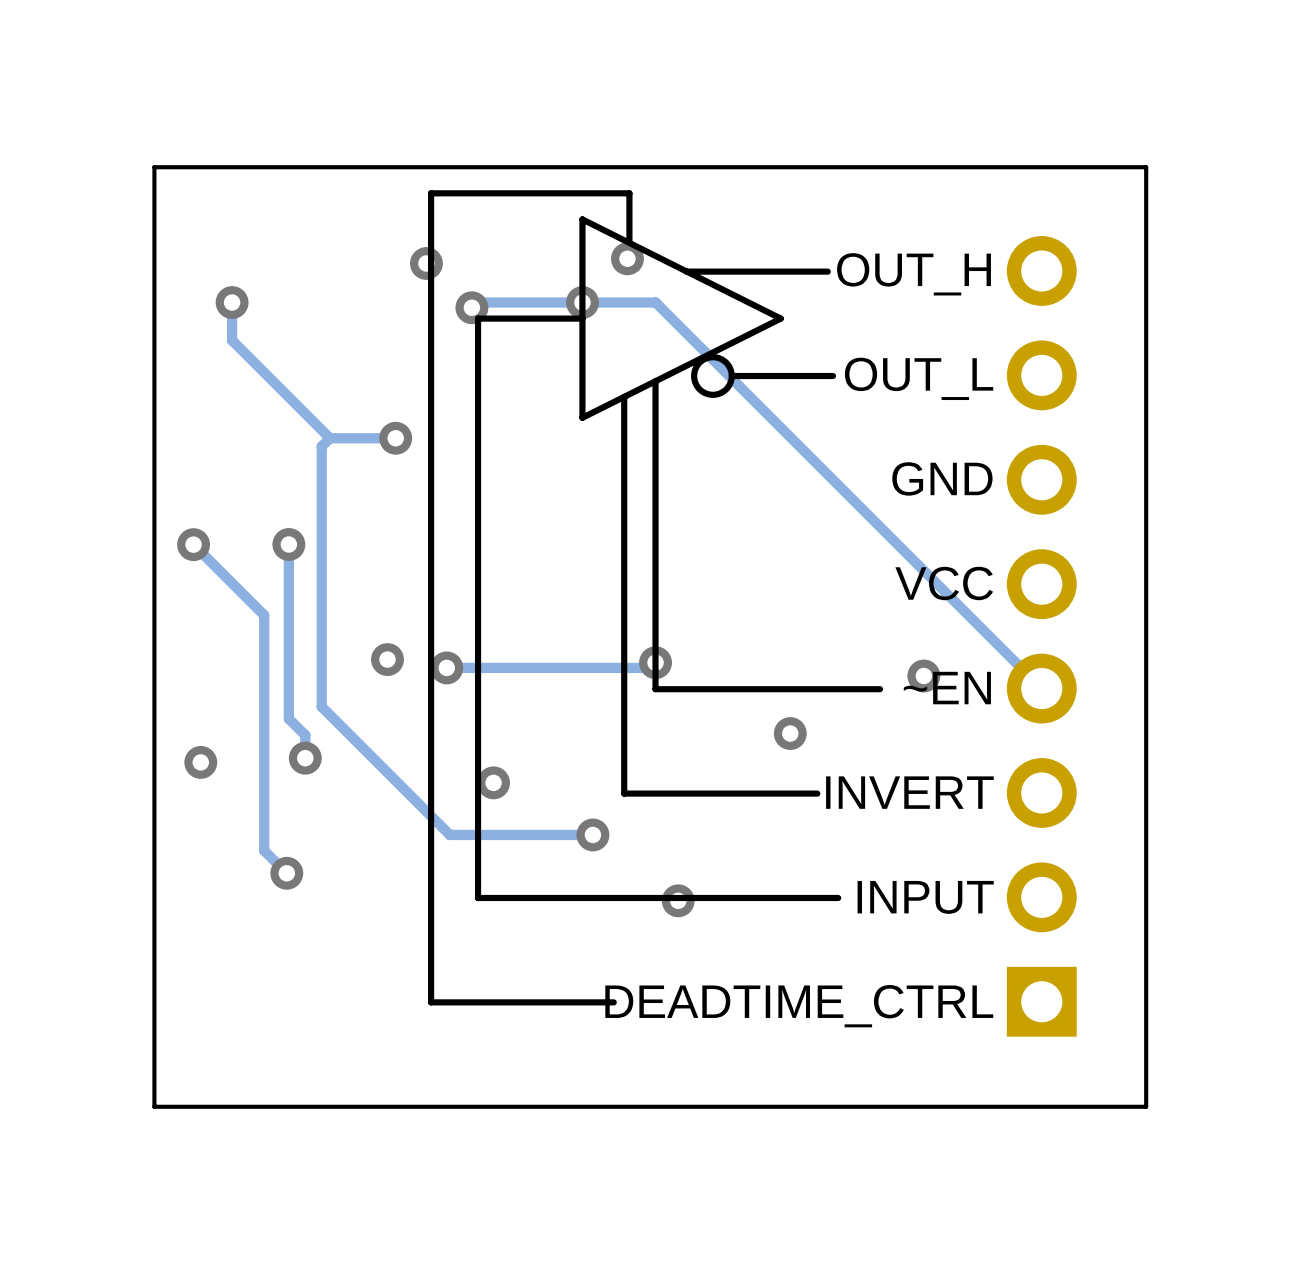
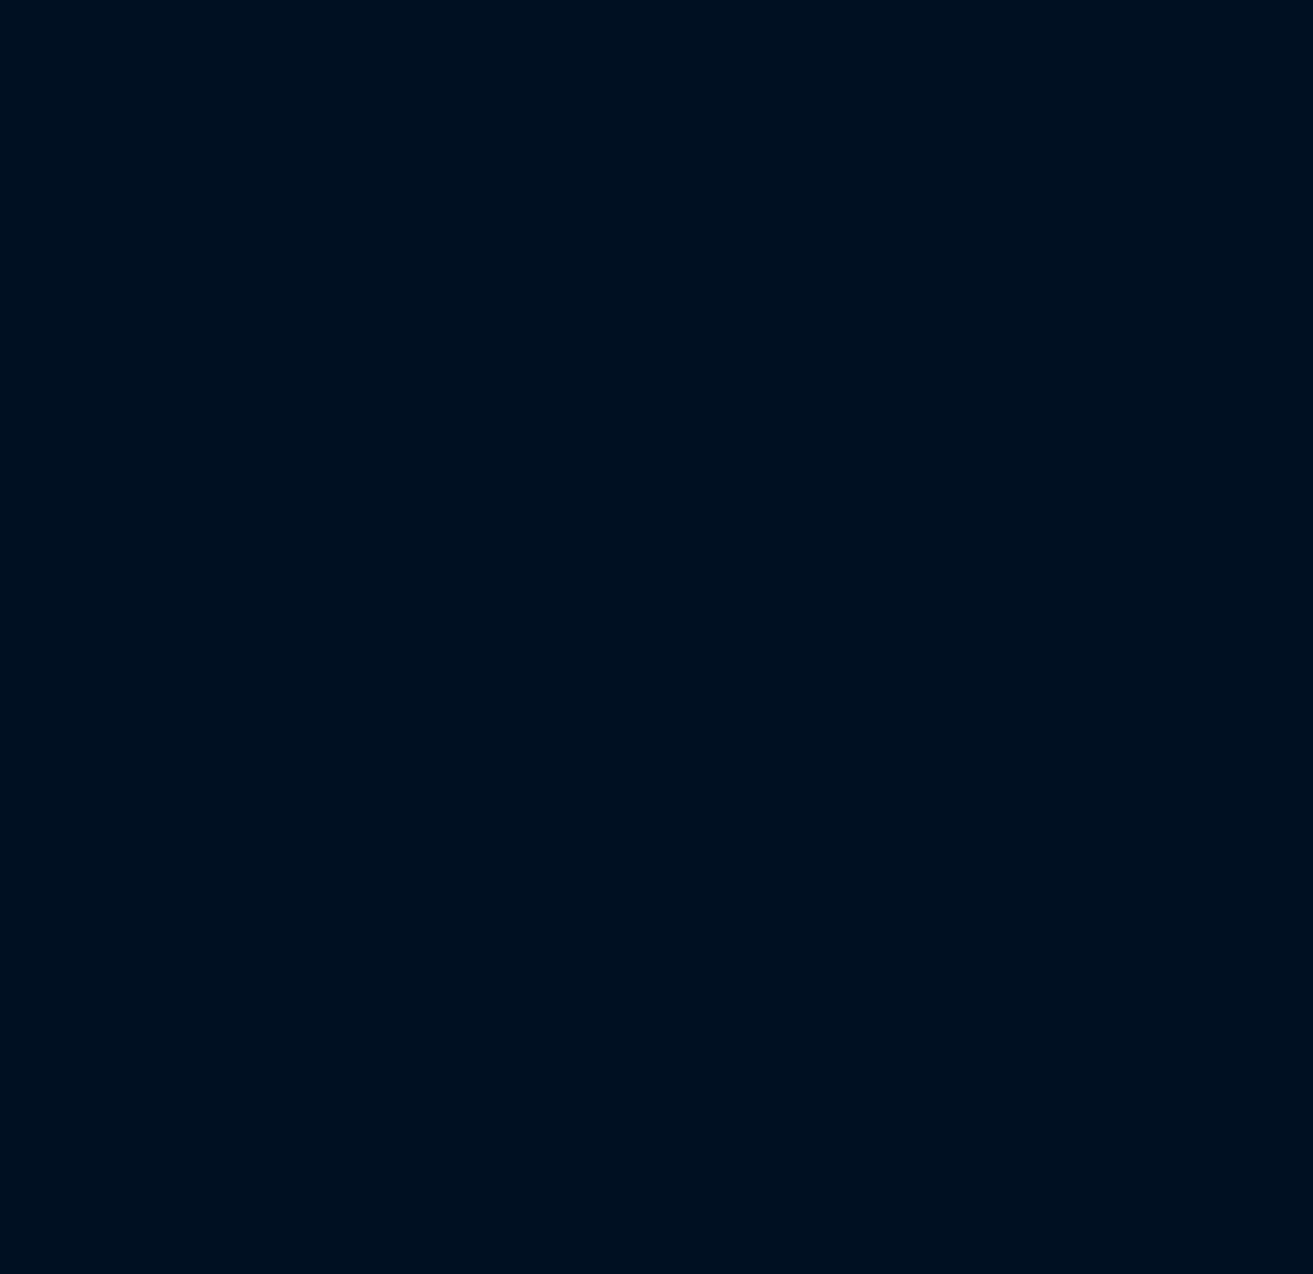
board edge: (1146, 167) (154, 167) (154, 1106) (1146, 1106) (1146, 167) -> none
line: (582, 219) (780, 318) (582, 417) (582, 219) -> none
line: (629, 240) (629, 193) (431, 193) (431, 1002) (613, 1002) -> none
via: (627, 258) -> none
via: (426, 263) -> none
line: (827, 271) (686, 271) -> none
text: OUT_H (914, 274) -> none
track: (232, 302) (232, 340) (329, 438) -> none
via: (232, 302) -> none
via: (582, 302) -> none
track: (471, 307) (477, 302) (655, 302) (1041, 688) -> none
via: (471, 307) -> none
line: (582, 318) (478, 318) (478, 897) (838, 897) -> none
drawing: [691, 354, 735, 398] -> none
line: (832, 376) (731, 376) -> none
text: OUT_L (919, 378) -> none
line: (655, 381) (655, 689) (879, 689) -> none
line: (624, 396) (624, 793) (817, 793) -> none
track: (329, 438) (321, 446) (321, 706) (449, 834) (592, 834) -> none
track: (395, 438) (329, 438) -> none
via: (395, 438) -> none
text: GND (942, 478) -> none
track: (193, 544) (264, 615) (264, 850) (286, 873) -> none
via: (193, 544) -> none
track: (288, 544) (288, 718) (305, 735) (305, 758) -> none
via: (288, 544) -> none
text: VCC (944, 583) -> none
part: (1041, 636) -> none
via: (387, 659) -> none
track: (655, 662) (650, 667) (446, 667) -> none
via: (655, 662) -> none
via: (446, 667) -> none
via: (923, 676) -> none
text: ~EN (947, 688) -> none
via: (790, 733) -> none
via: (305, 758) -> none
via: (200, 762) -> none
via: (493, 782) -> none
text: INVERT (909, 792) -> none
via: (592, 834) -> none
via: (286, 873) -> none
text: INPUT (925, 897) -> none
via: (678, 900) -> none
text: DEADTIME_CTRL (799, 1006) -> none

